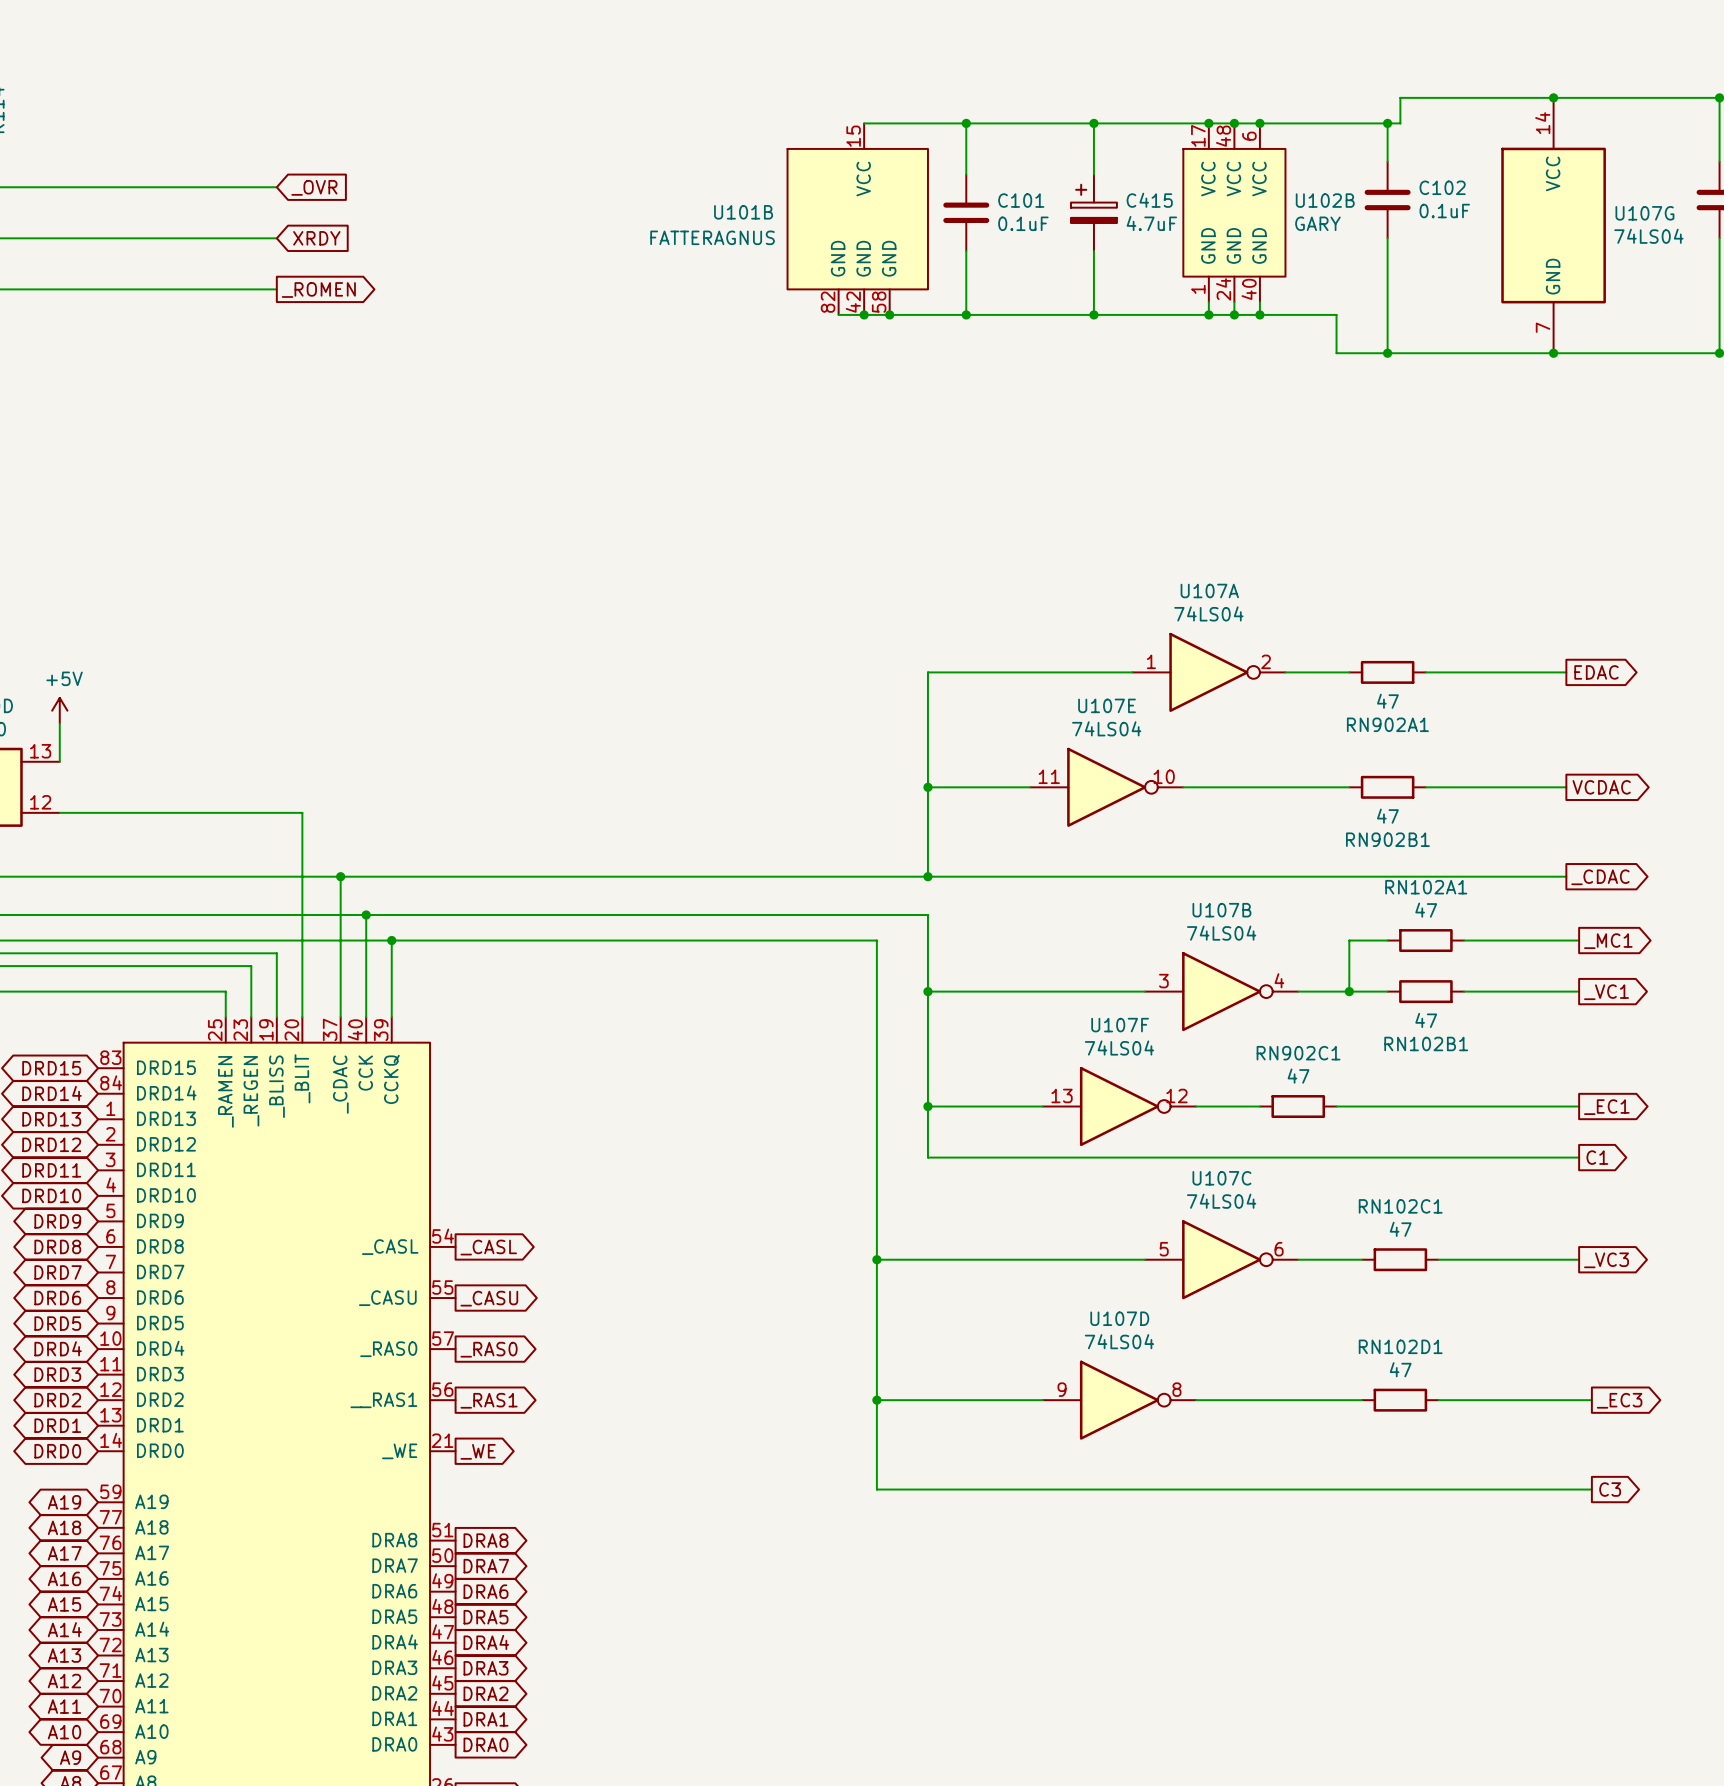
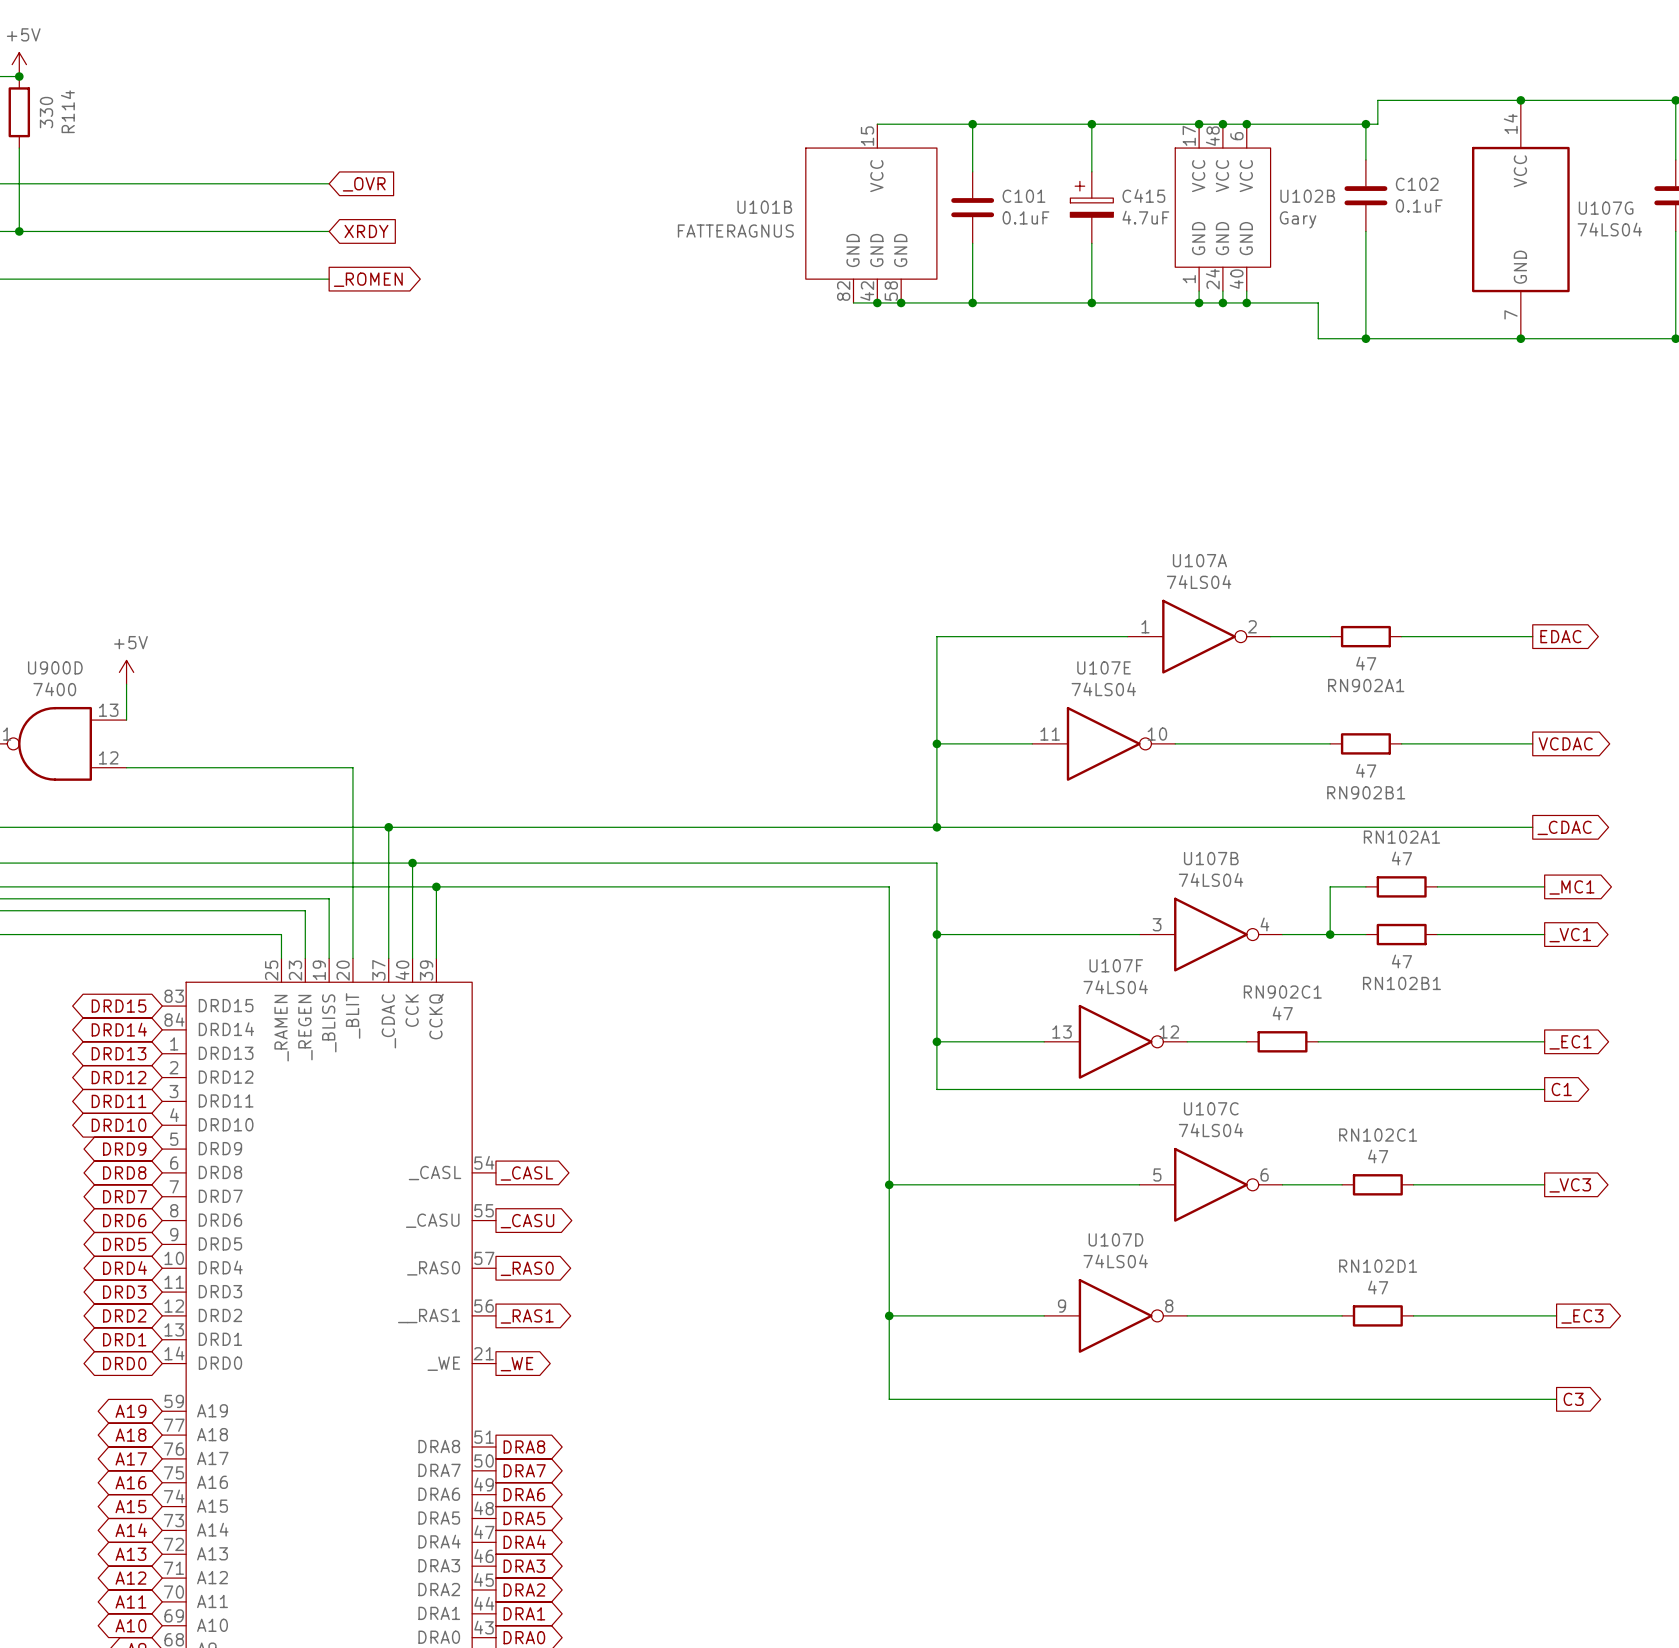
U102B value: GARY (1317, 223) -> Gary (1298, 219)

